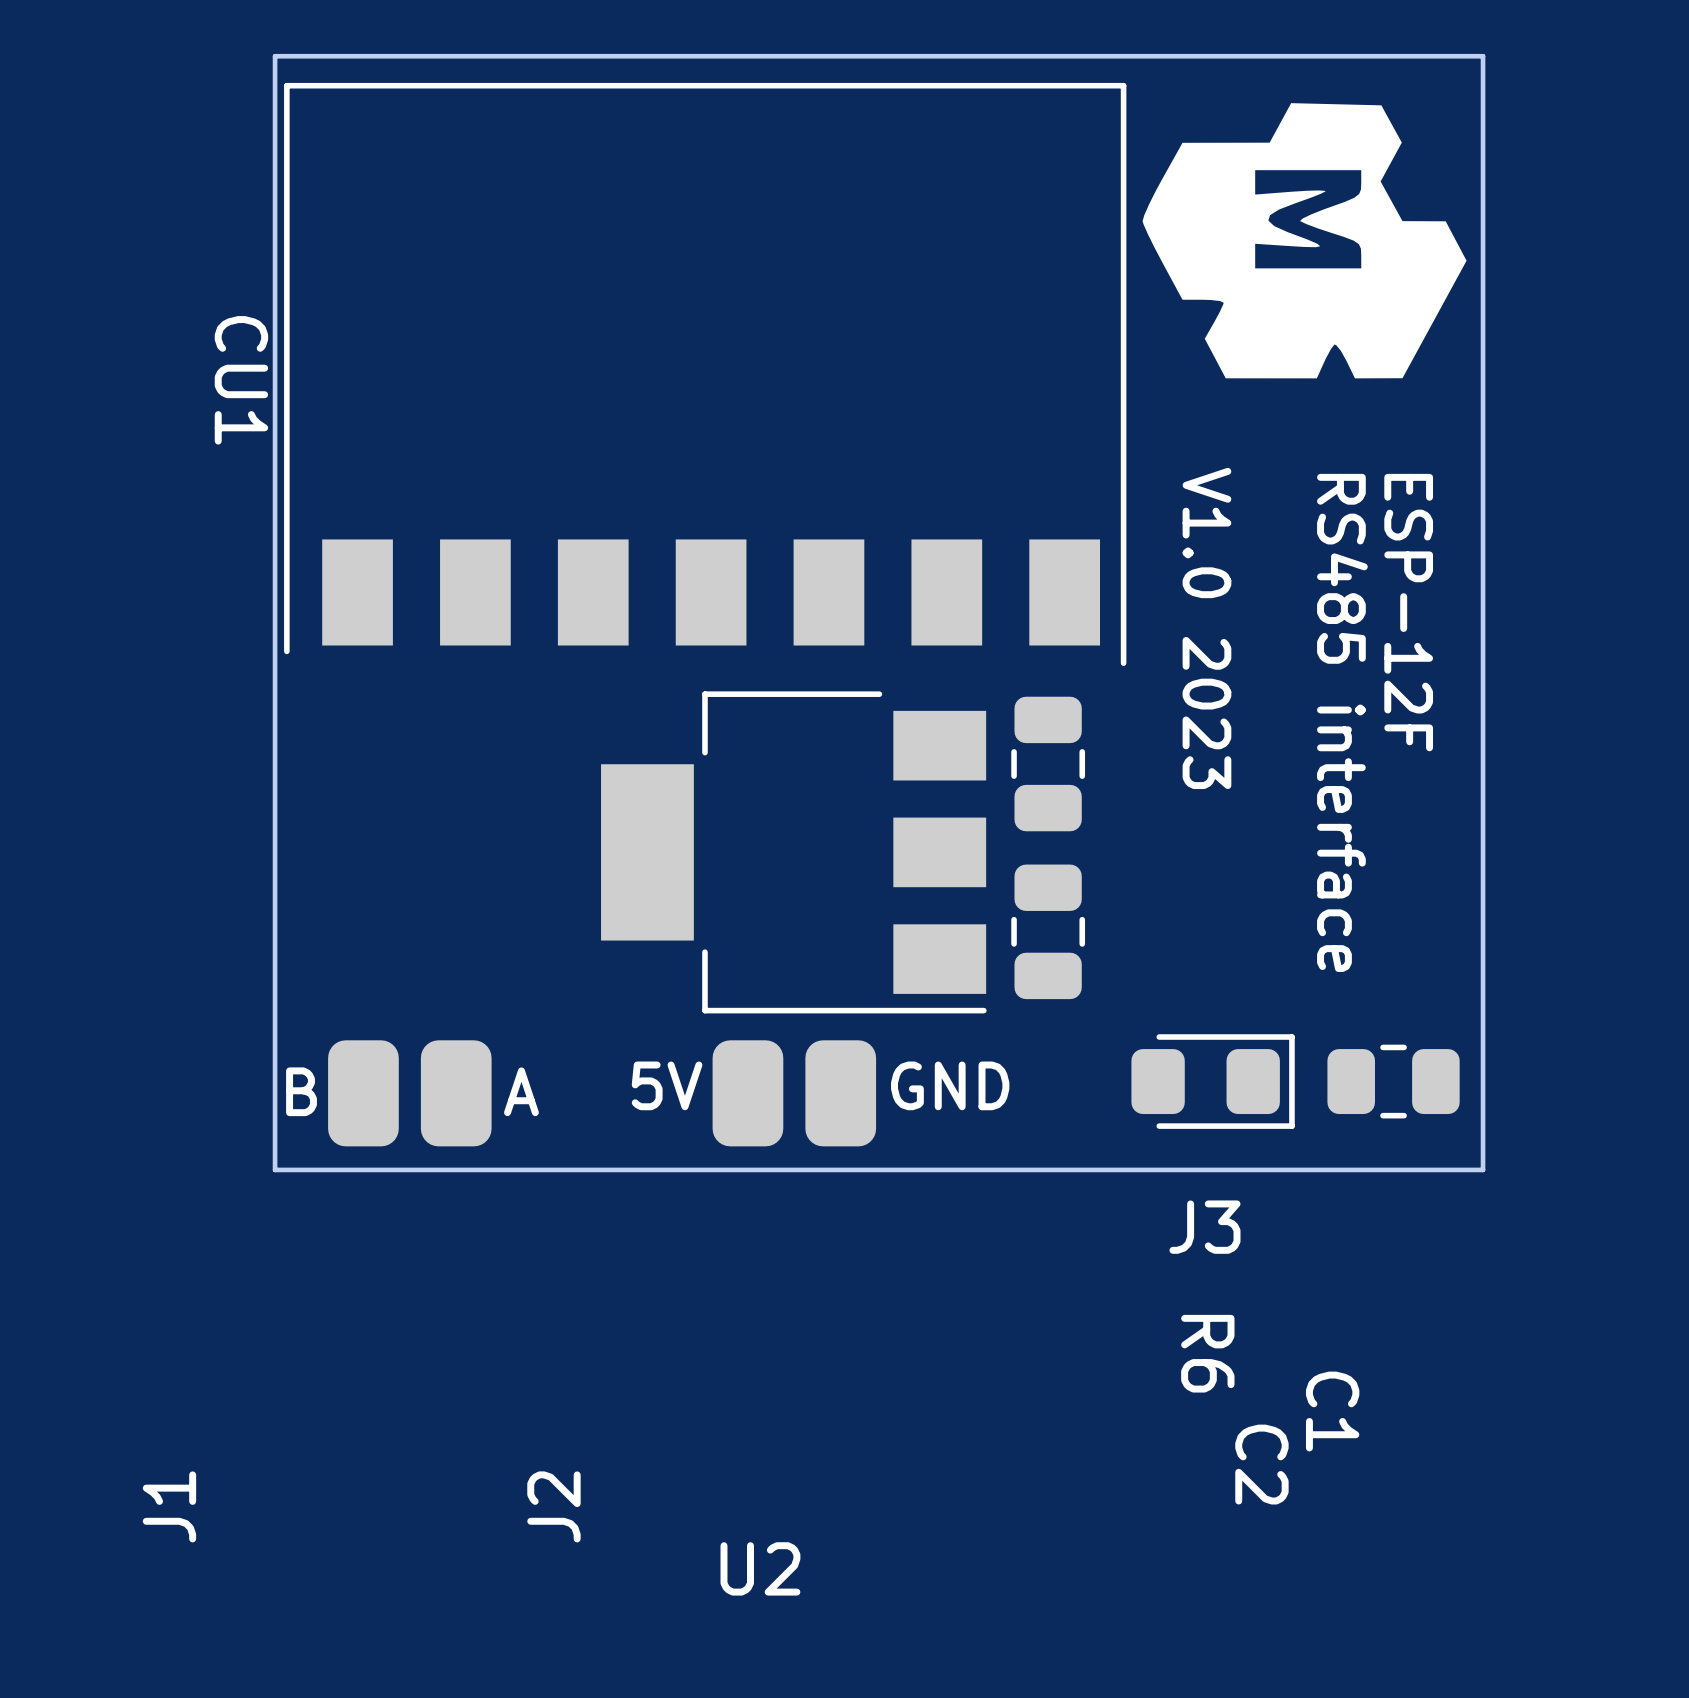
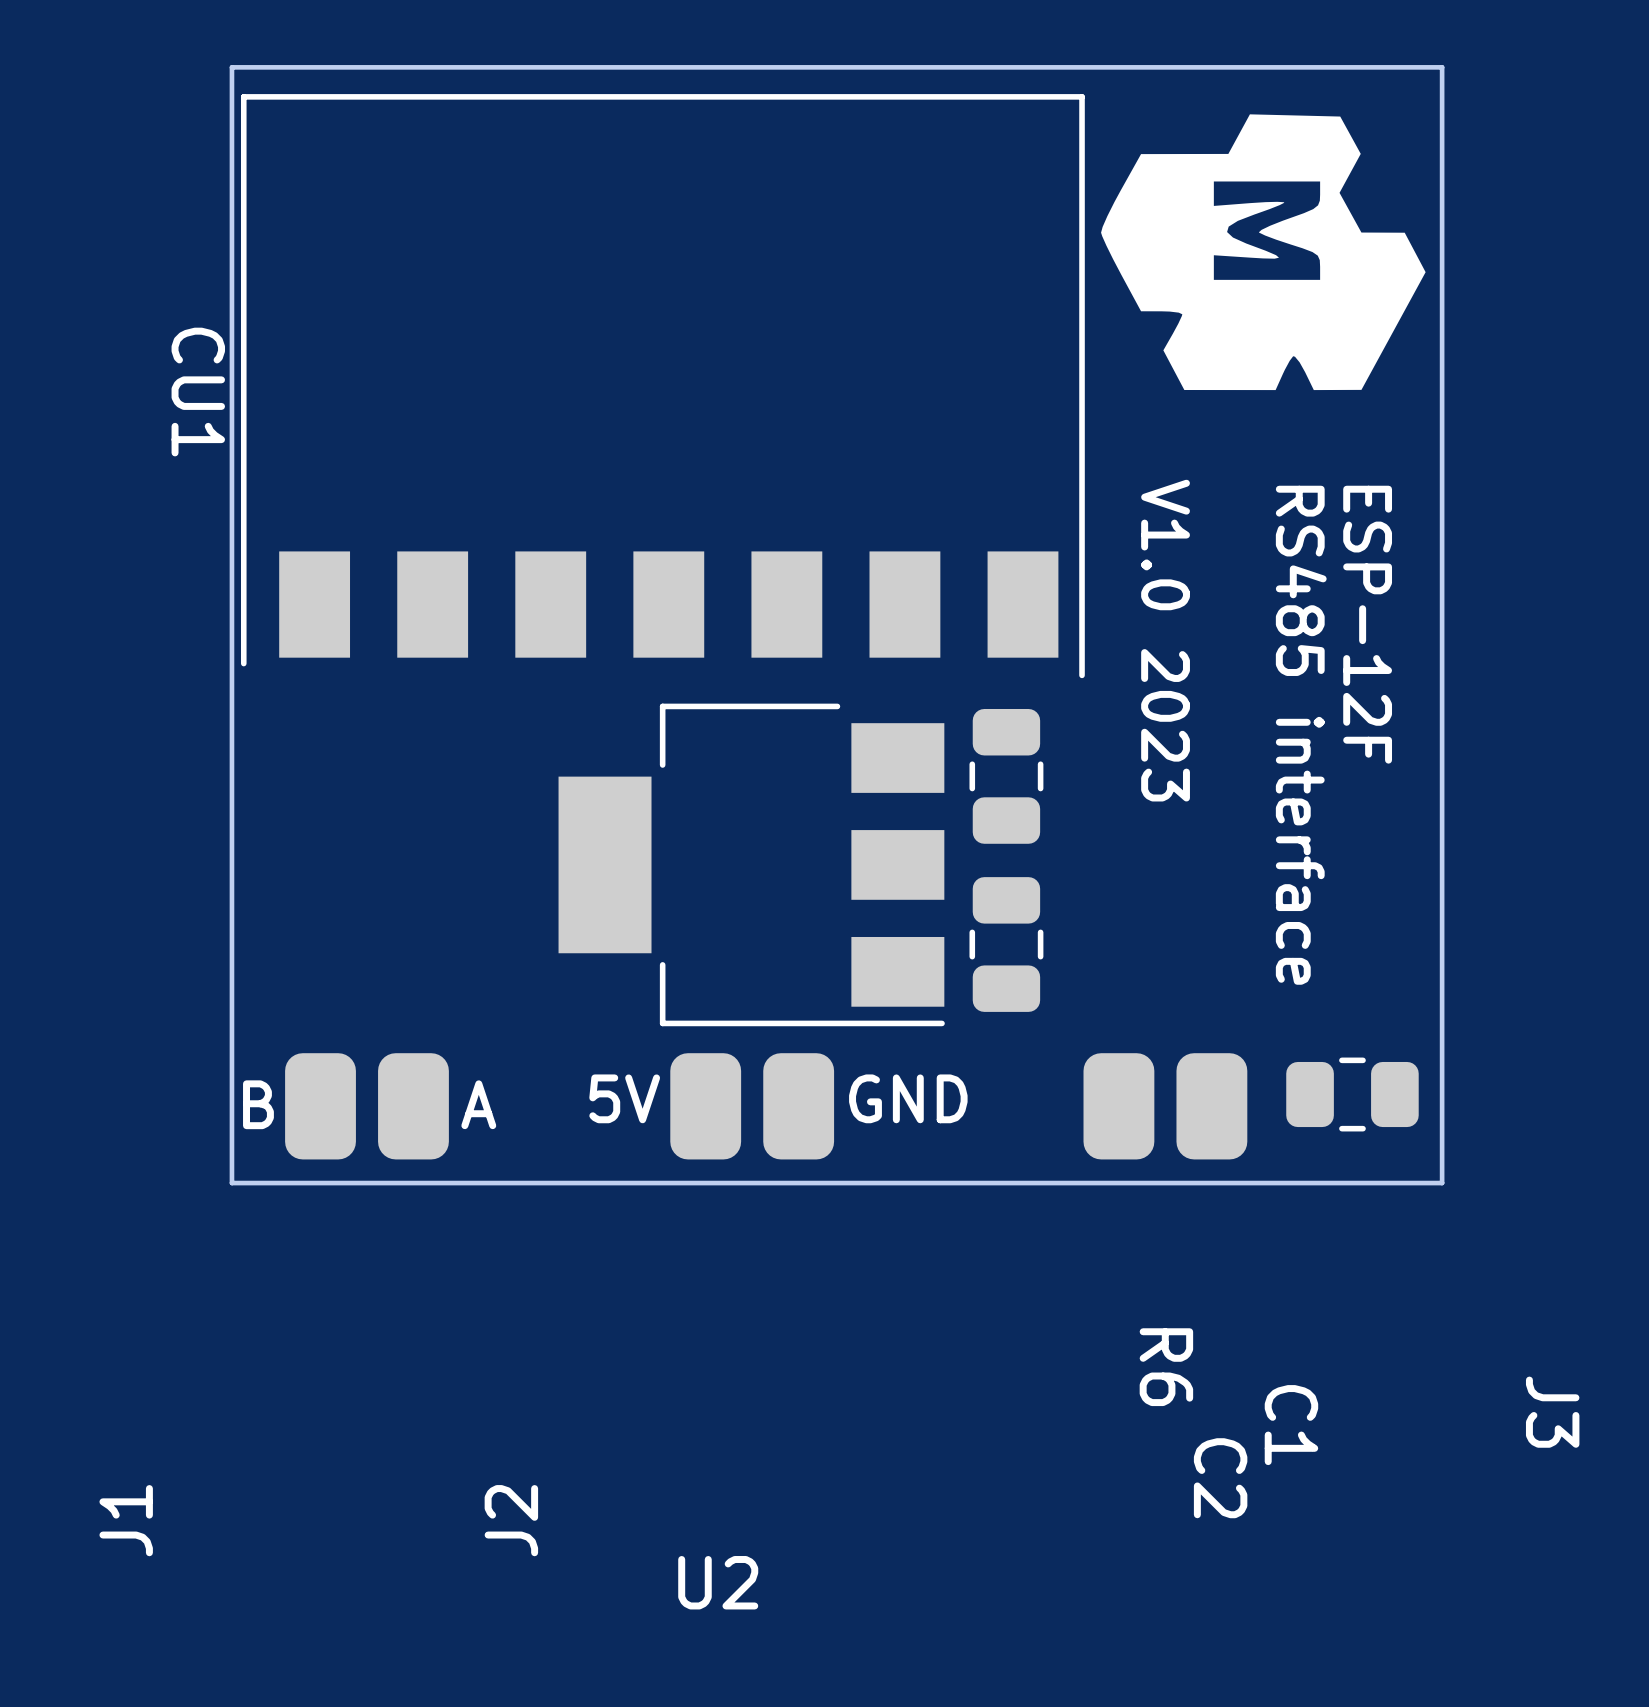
J3 footprint: [1131, 1034, 1295, 1129] -> [1083, 1053, 1248, 1160]
J3 name position: J3 (1204, 1227) -> J3 (1552, 1412)

